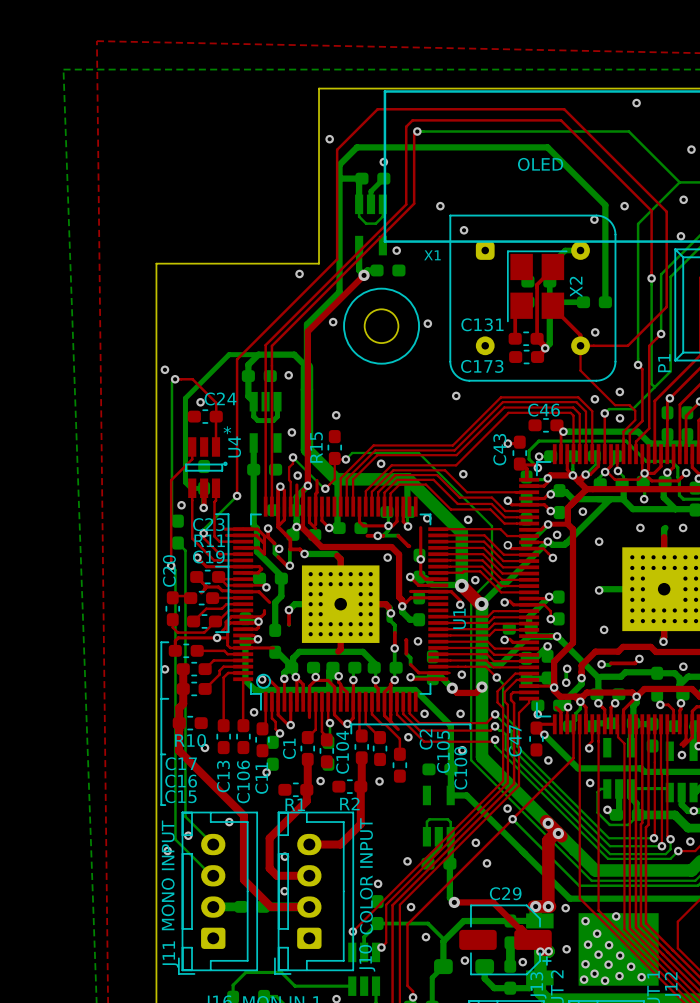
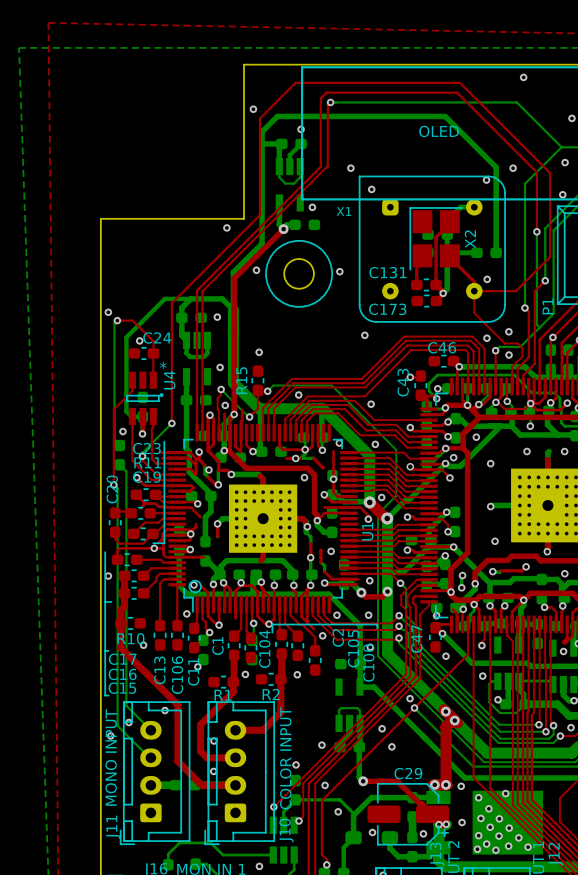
line: (215, 514) (228, 514) (228, 516) -> none
line: (215, 566) (228, 566) -> none
line: (161, 642) (168, 642) -> none

